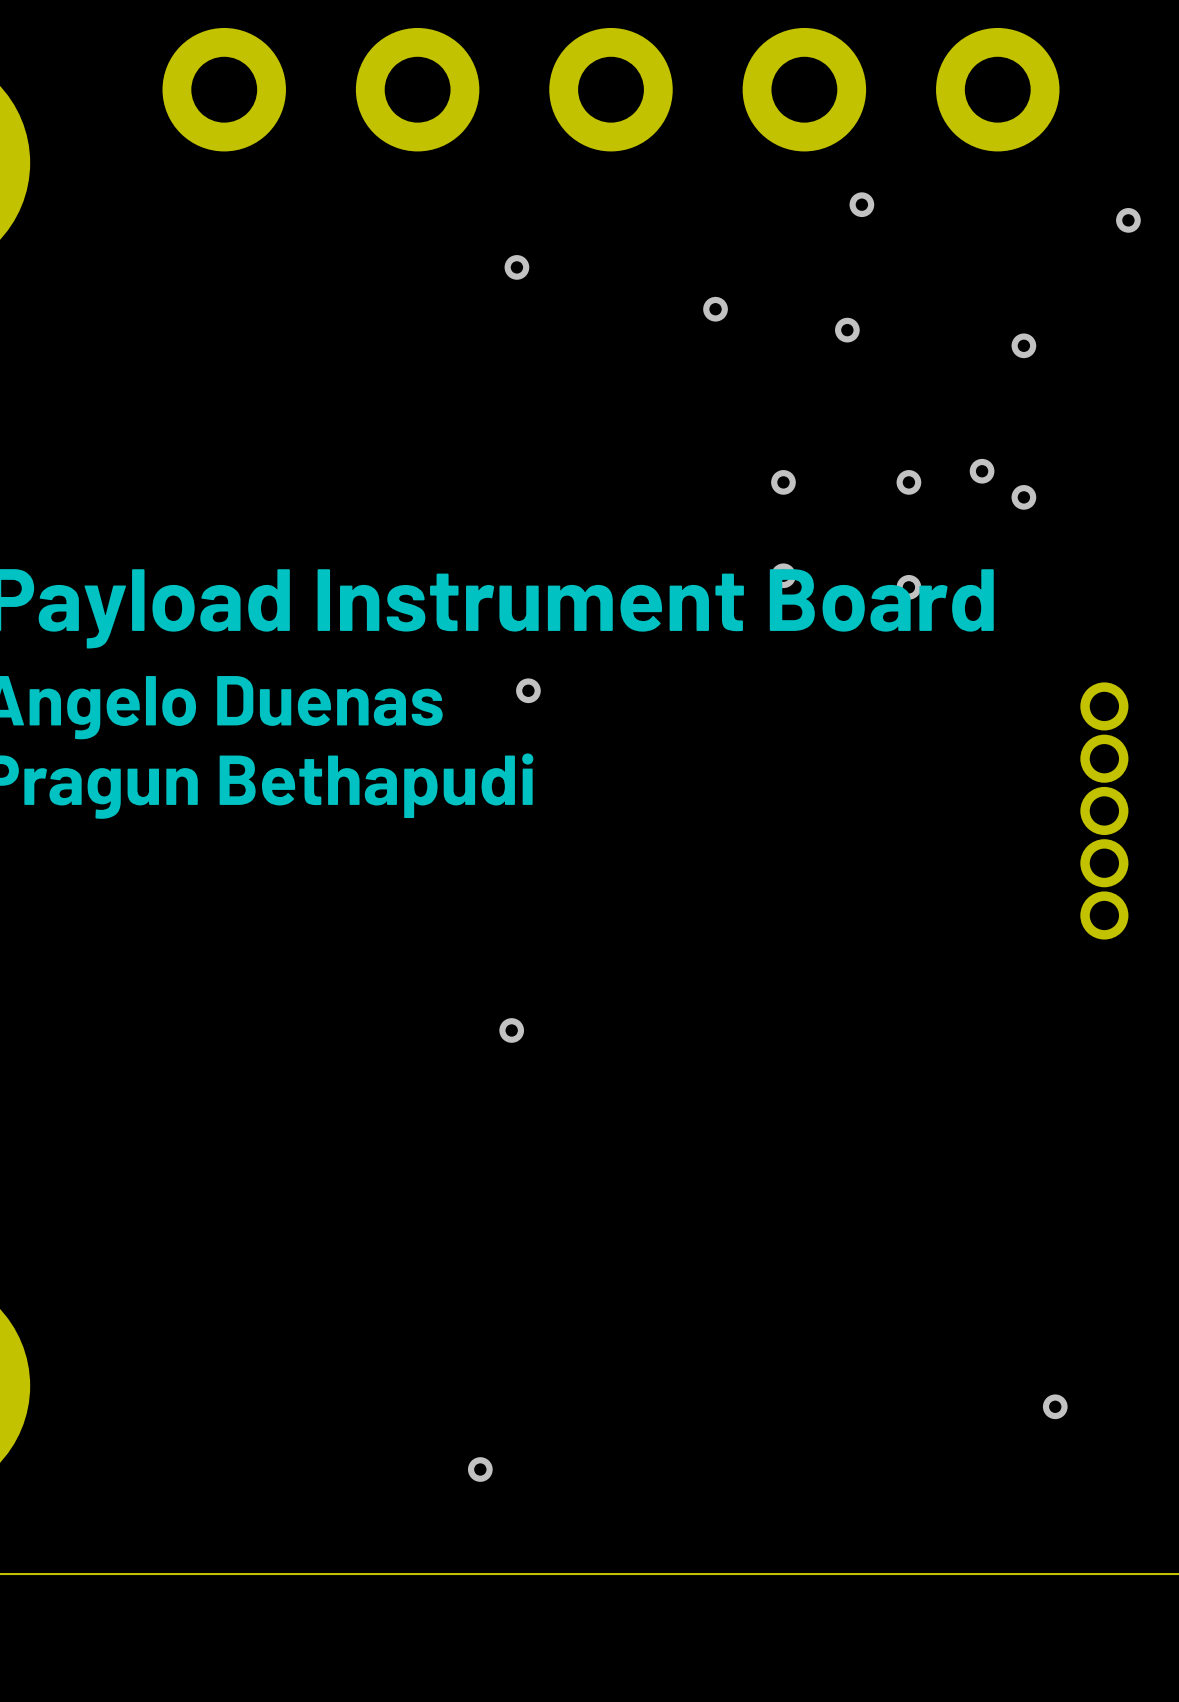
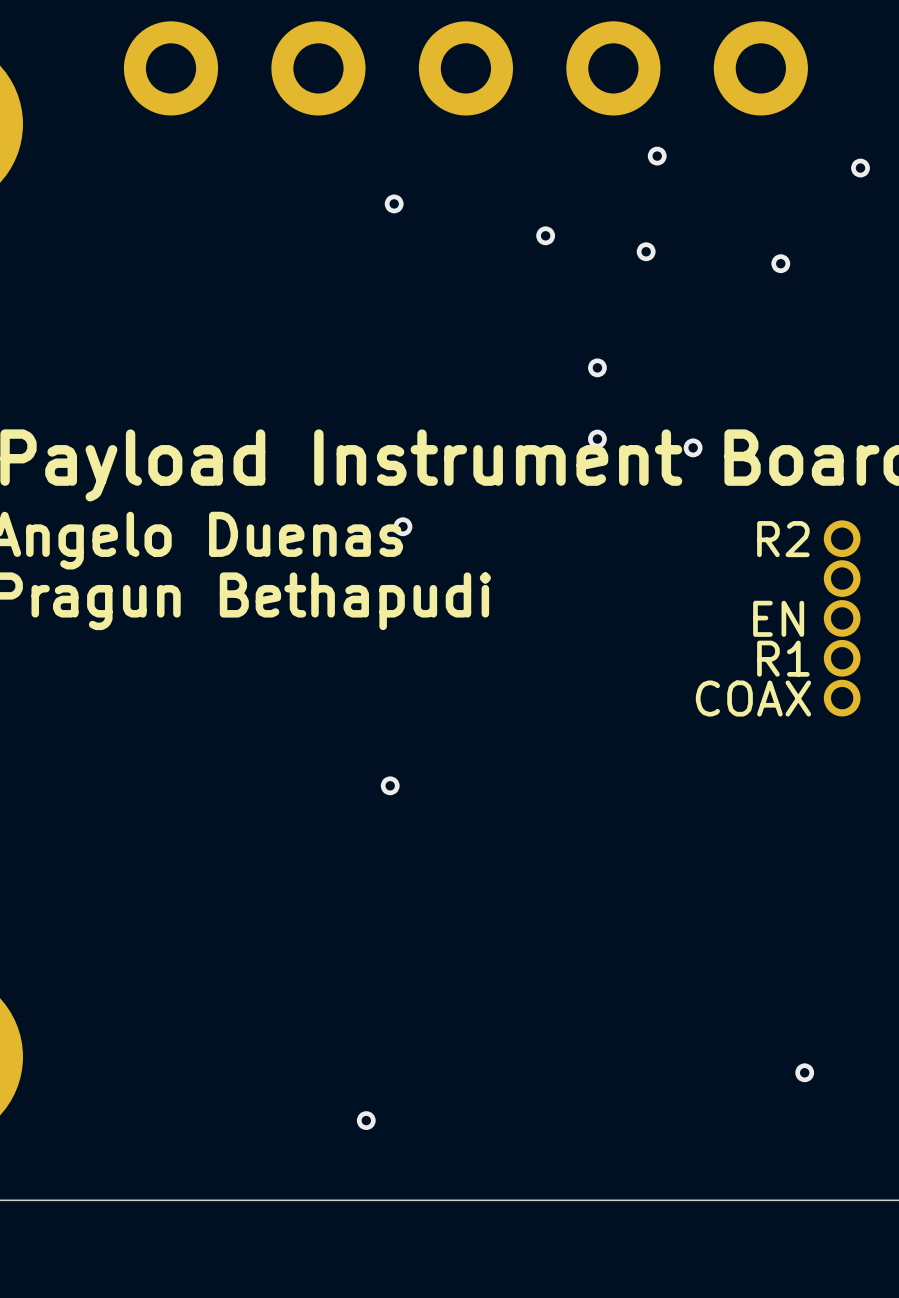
via: (982, 471) -> none
via: (908, 482) -> none
via: (1023, 497) -> none
text: none -> R2 (783, 539)
text: none -> EN (778, 618)
text: none -> R1 (783, 658)
text: none -> COAX (753, 698)

